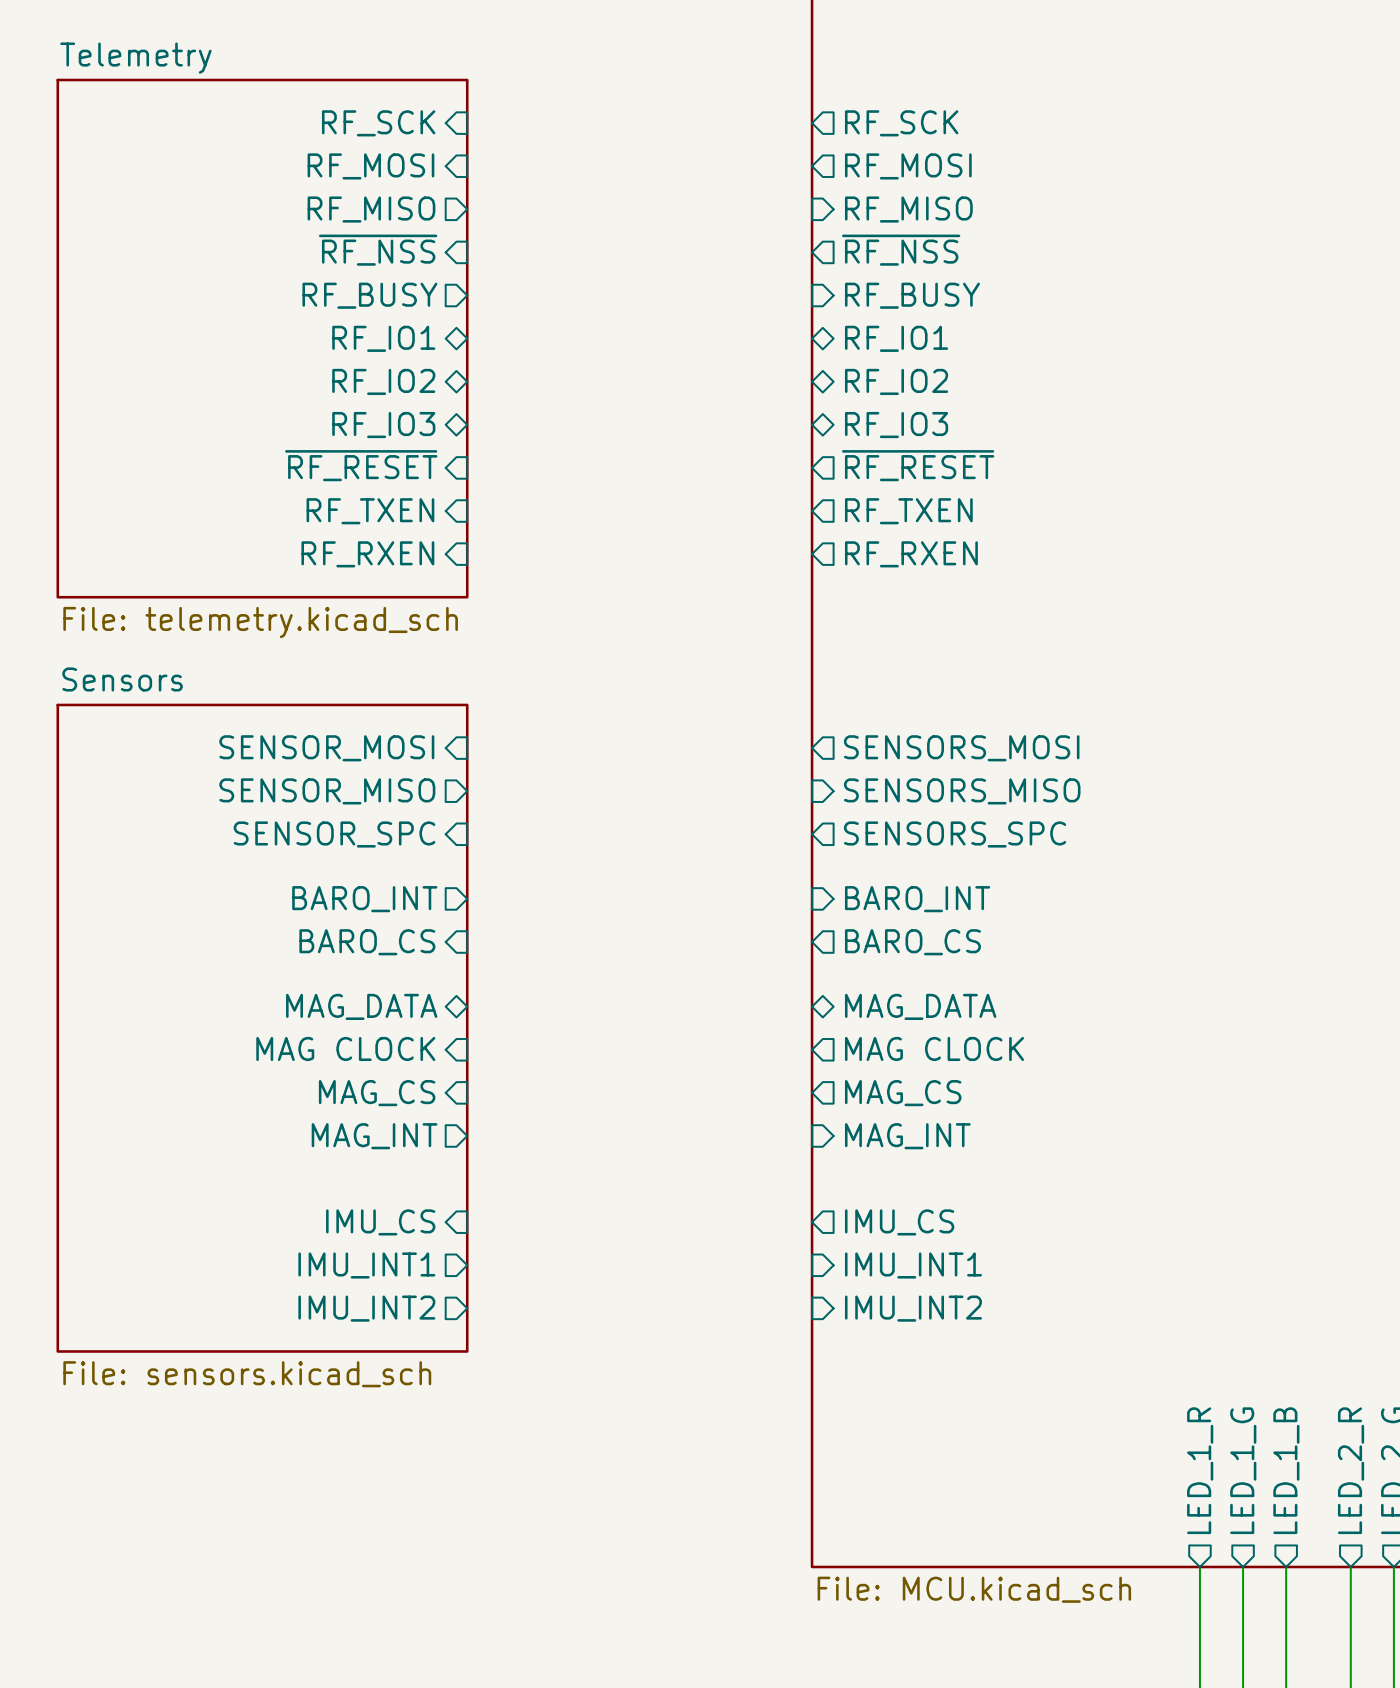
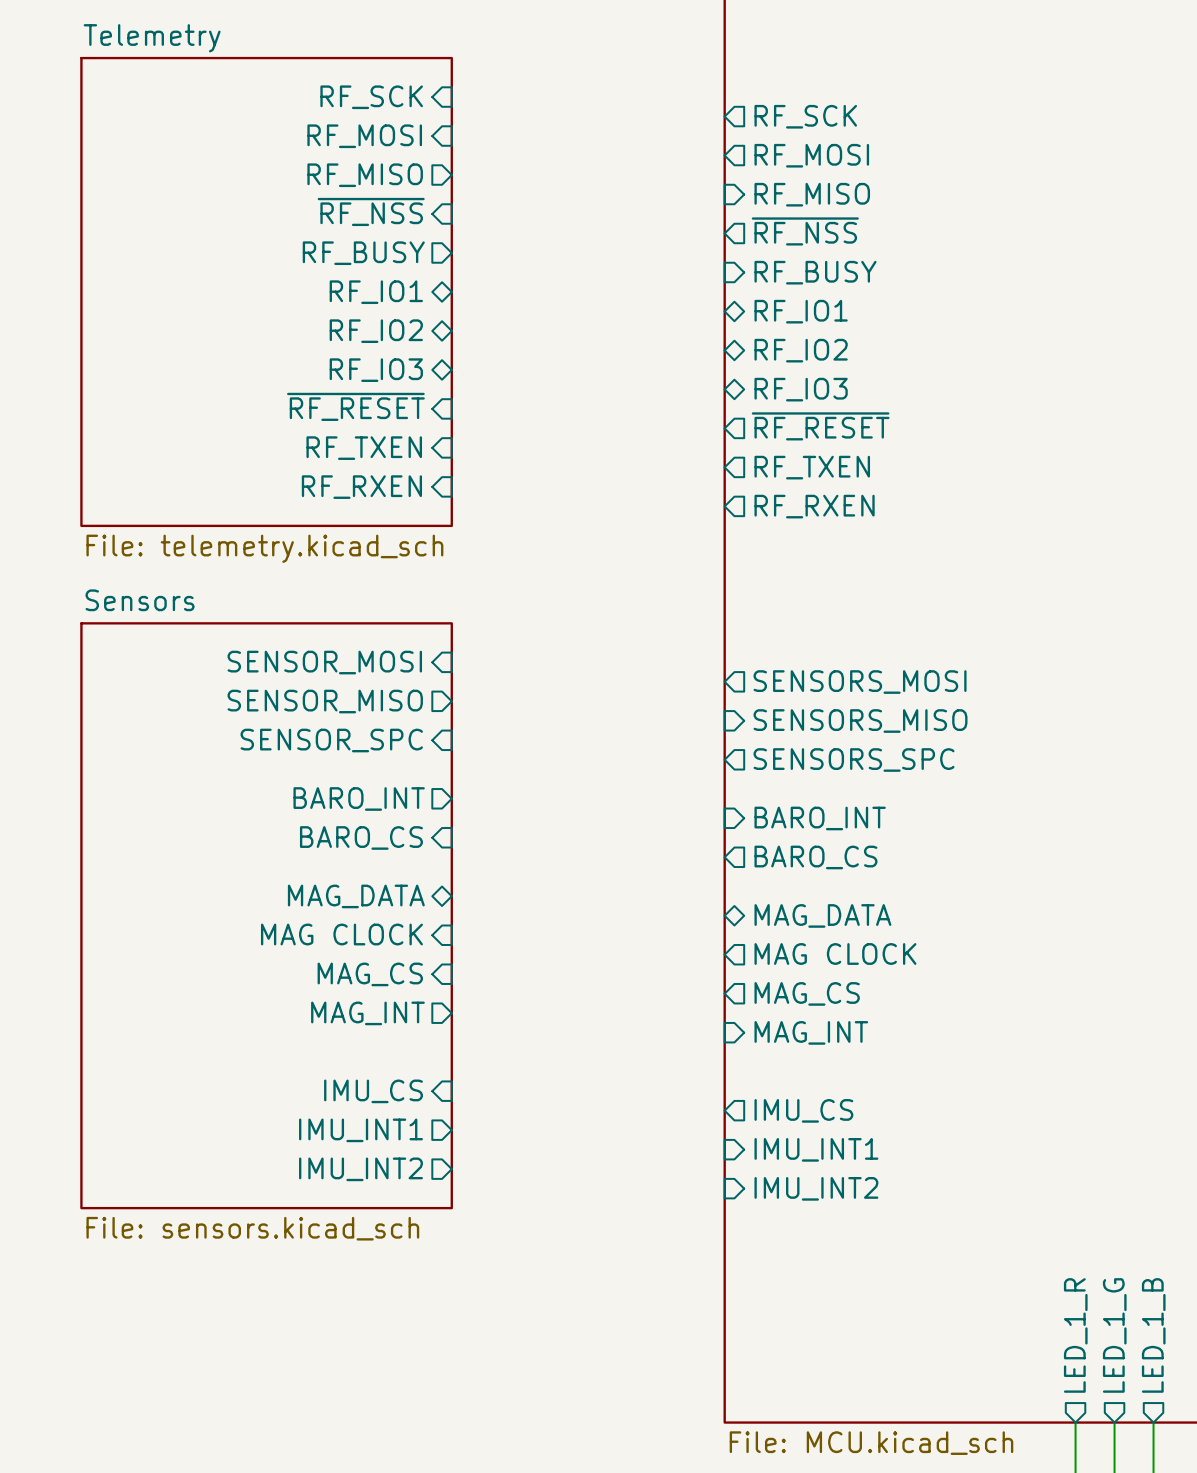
sheet pin position: RF_SCK (378, 123) -> RF_SCK (371, 97)
sheet pin position: RF_MOSI (370, 166) -> RF_MOSI (364, 136)
sheet pin position: RF_MISO (371, 209) -> RF_MISO (365, 175)
sheet pin position: ~{RF_NSS} (378, 250) -> ~{RF_NSS} (371, 211)
sheet pin position: RF_BUSY (369, 295) -> RF_BUSY (363, 253)
sheet Telemetry position: (262, 338) -> (266, 291)
sheet pin position: RF_IO1 (383, 338) -> RF_IO1 (376, 292)
sheet pin position: RF_IO2 (383, 381) -> RF_IO2 (376, 331)
sheet pin position: RF_IO3 (383, 425) -> RF_IO3 (376, 370)
sheet pin position: ~{RF_RESET} (361, 465) -> ~{RF_RESET} (355, 406)
sheet pin position: RF_TXEN (370, 511) -> RF_TXEN (364, 448)
sheet pin position: RF_RXEN (367, 554) -> RF_RXEN (361, 487)
sheet pin position: SENSOR_MOSI (326, 748) -> SENSOR_MOSI (324, 662)
sheet pin position: SENSOR_MISO (327, 791) -> SENSOR_MISO (325, 701)
sheet pin position: SENSOR_SPC (334, 834) -> SENSOR_SPC (331, 740)
sheet pin position: BARO_INT (364, 899) -> BARO_INT (359, 798)
sheet pin position: BARO_CS (367, 942) -> BARO_CS (361, 837)
sheet pin position: MAG_DATA (361, 1006) -> MAG_DATA (356, 896)
sheet Sensors position: (262, 1028) -> (266, 915)
sheet pin position: MAG CLOCK (345, 1048) -> MAG CLOCK (341, 934)
sheet pin position: MAG_CS (377, 1093) -> MAG_CS (370, 974)
sheet pin position: MAG_INT (374, 1136) -> MAG_INT (367, 1013)
sheet pin position: IMU_CS (380, 1222) -> IMU_CS (373, 1091)
sheet pin position: IMU_INT1 (366, 1265) -> IMU_INT1 (360, 1130)
sheet pin position: IMU_INT2 (366, 1308) -> IMU_INT2 (360, 1169)

